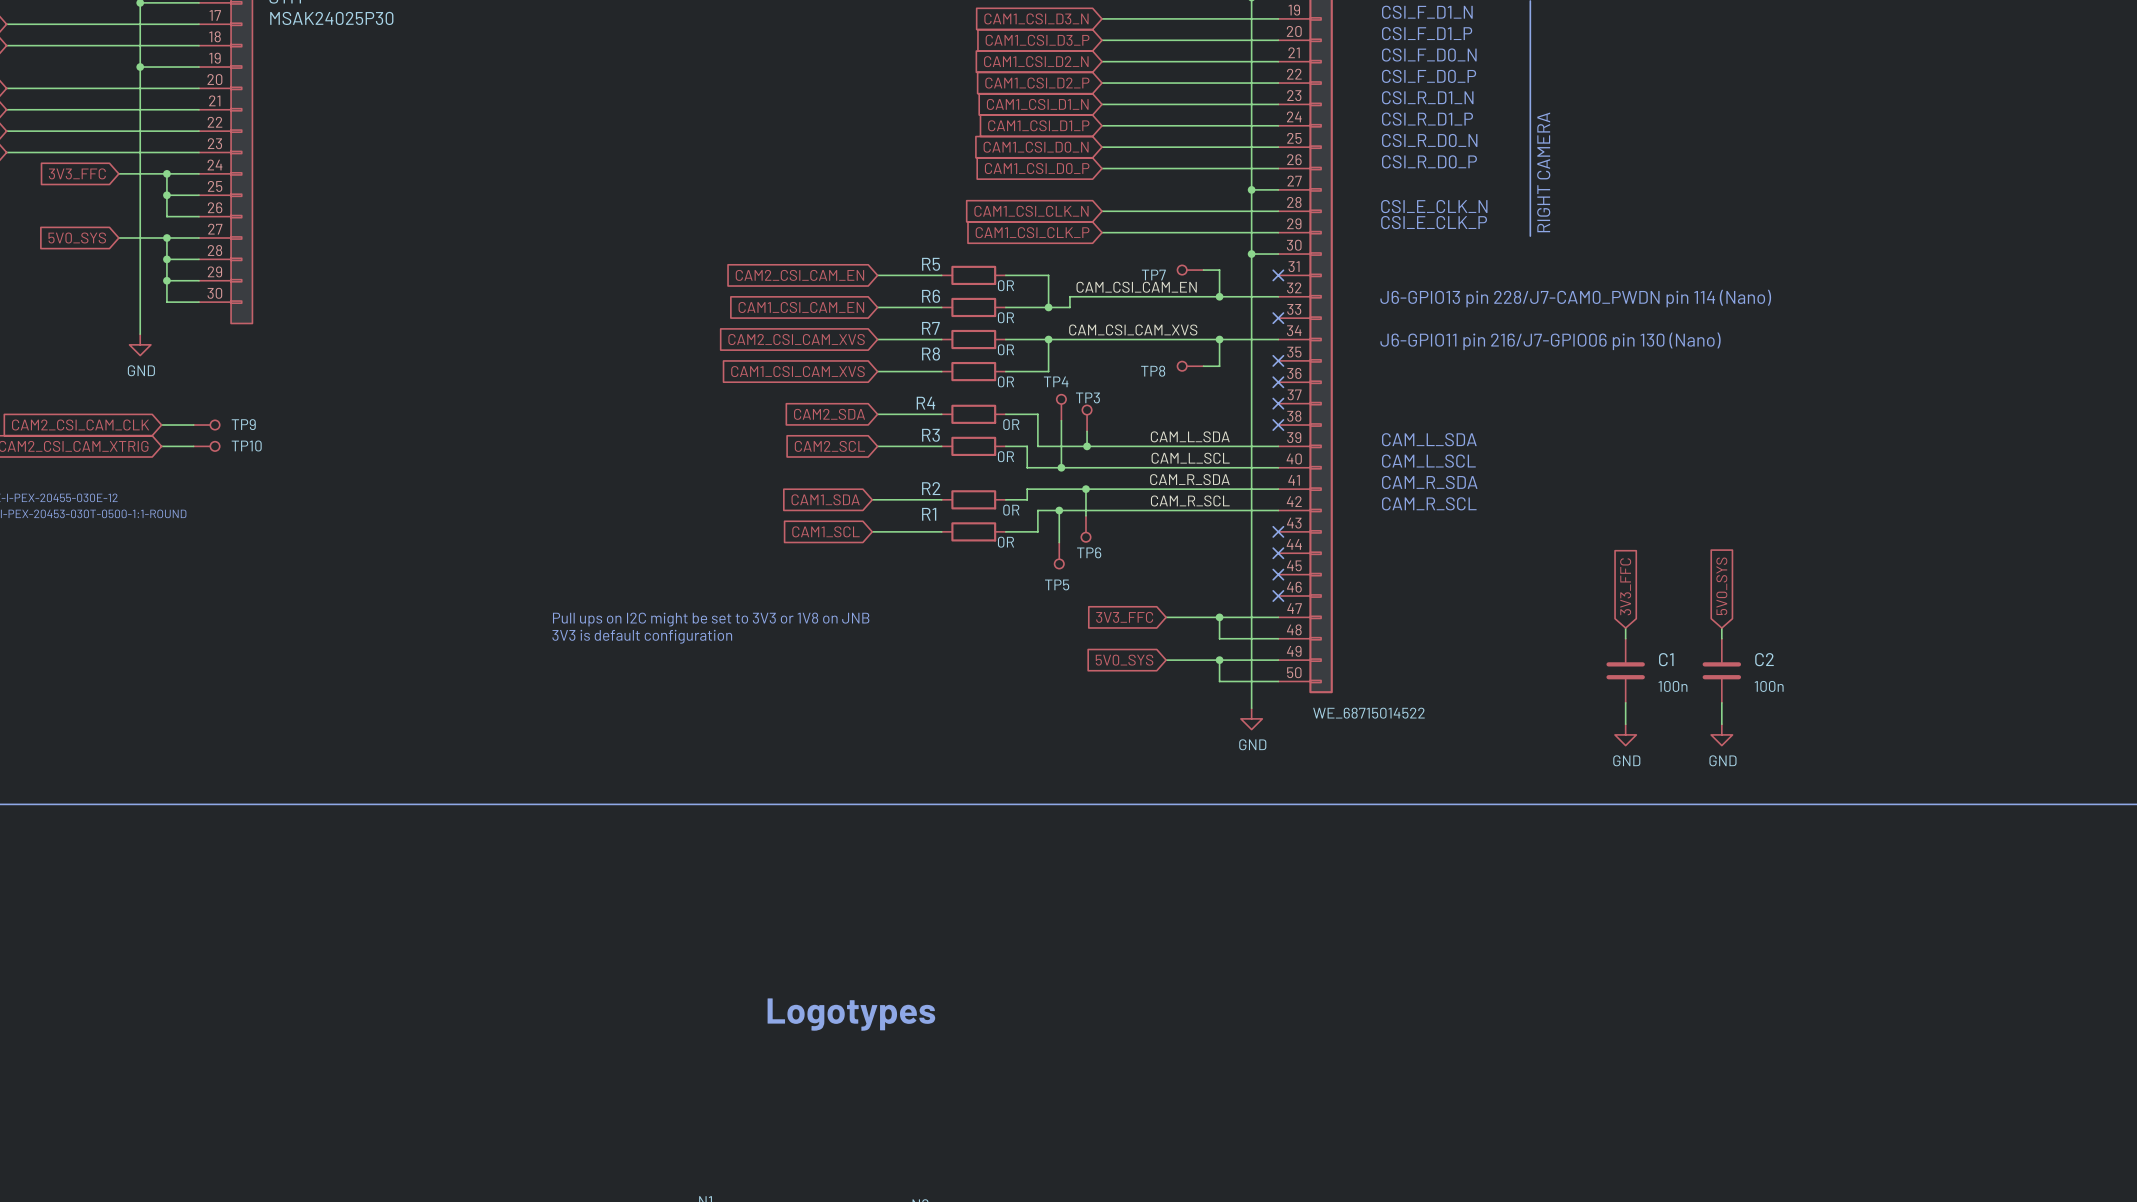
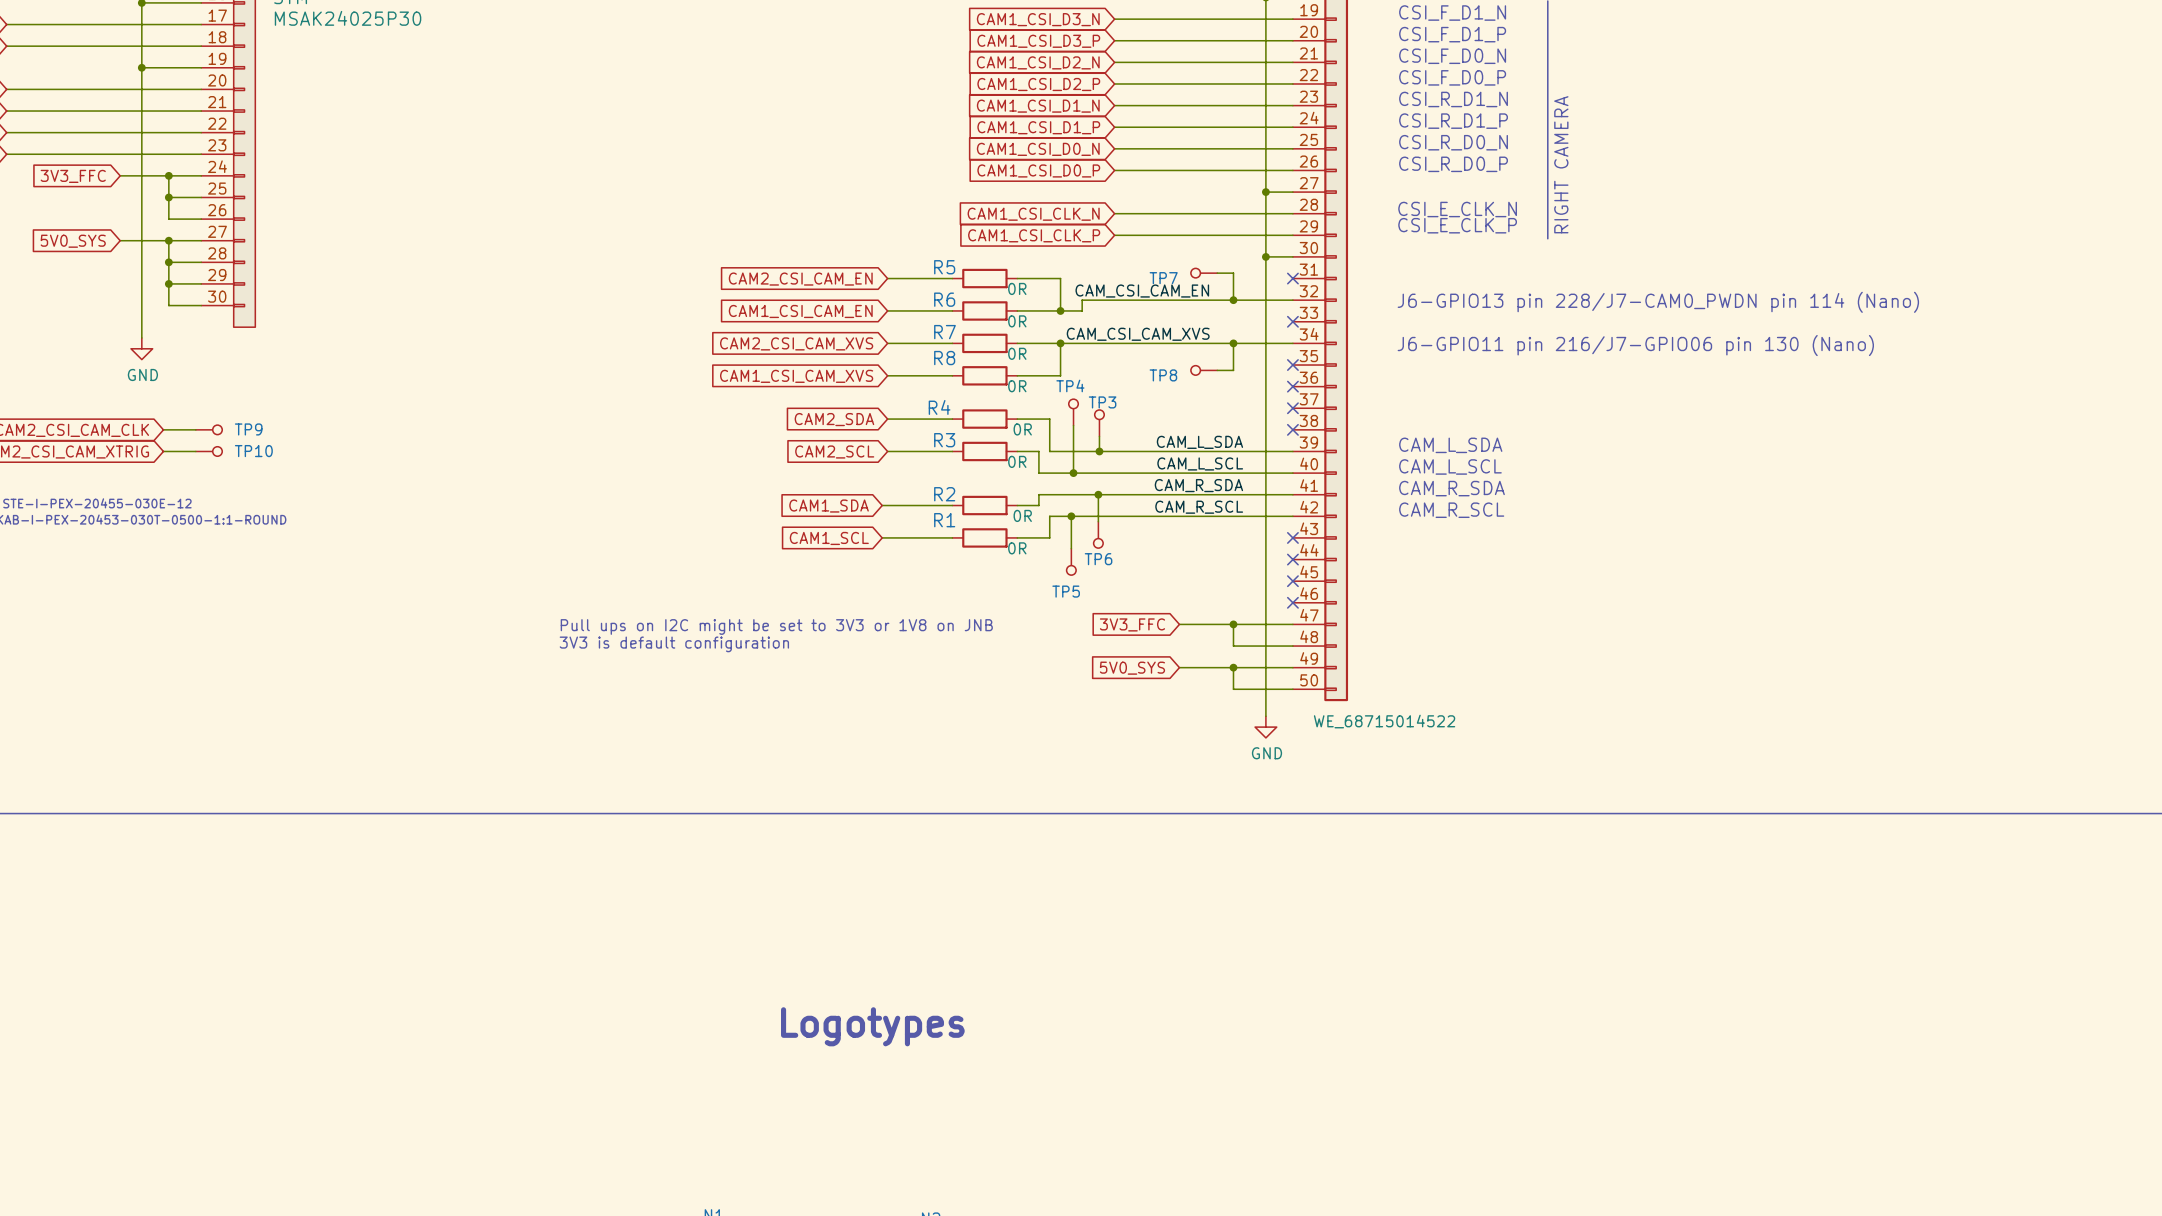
global label: 3V3_FFC (1625, 586) -> none
global label: 5V0_SYS (1721, 586) -> none
wire: (1625, 628) (1625, 638) -> none
wire: (1721, 628) (1721, 638) -> none
C1: (1625, 670) -> none
C2: (1721, 670) -> none
wire: (1625, 702) (1625, 724) -> none
wire: (1721, 702) (1721, 724) -> none
power symbol: GND (1625, 734) -> none
power symbol: GND (1721, 734) -> none

